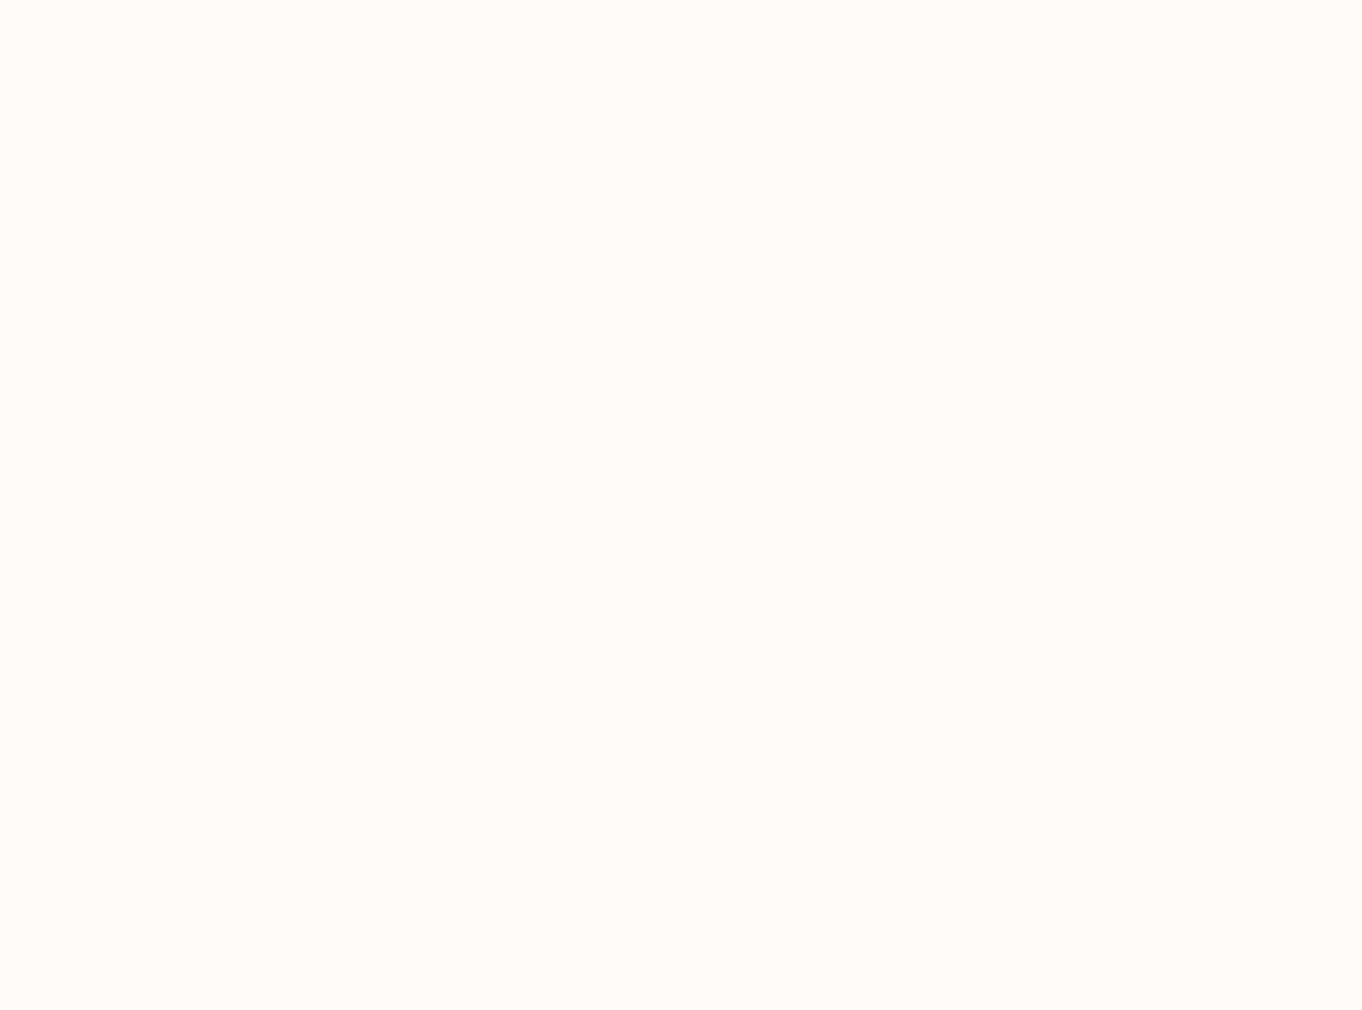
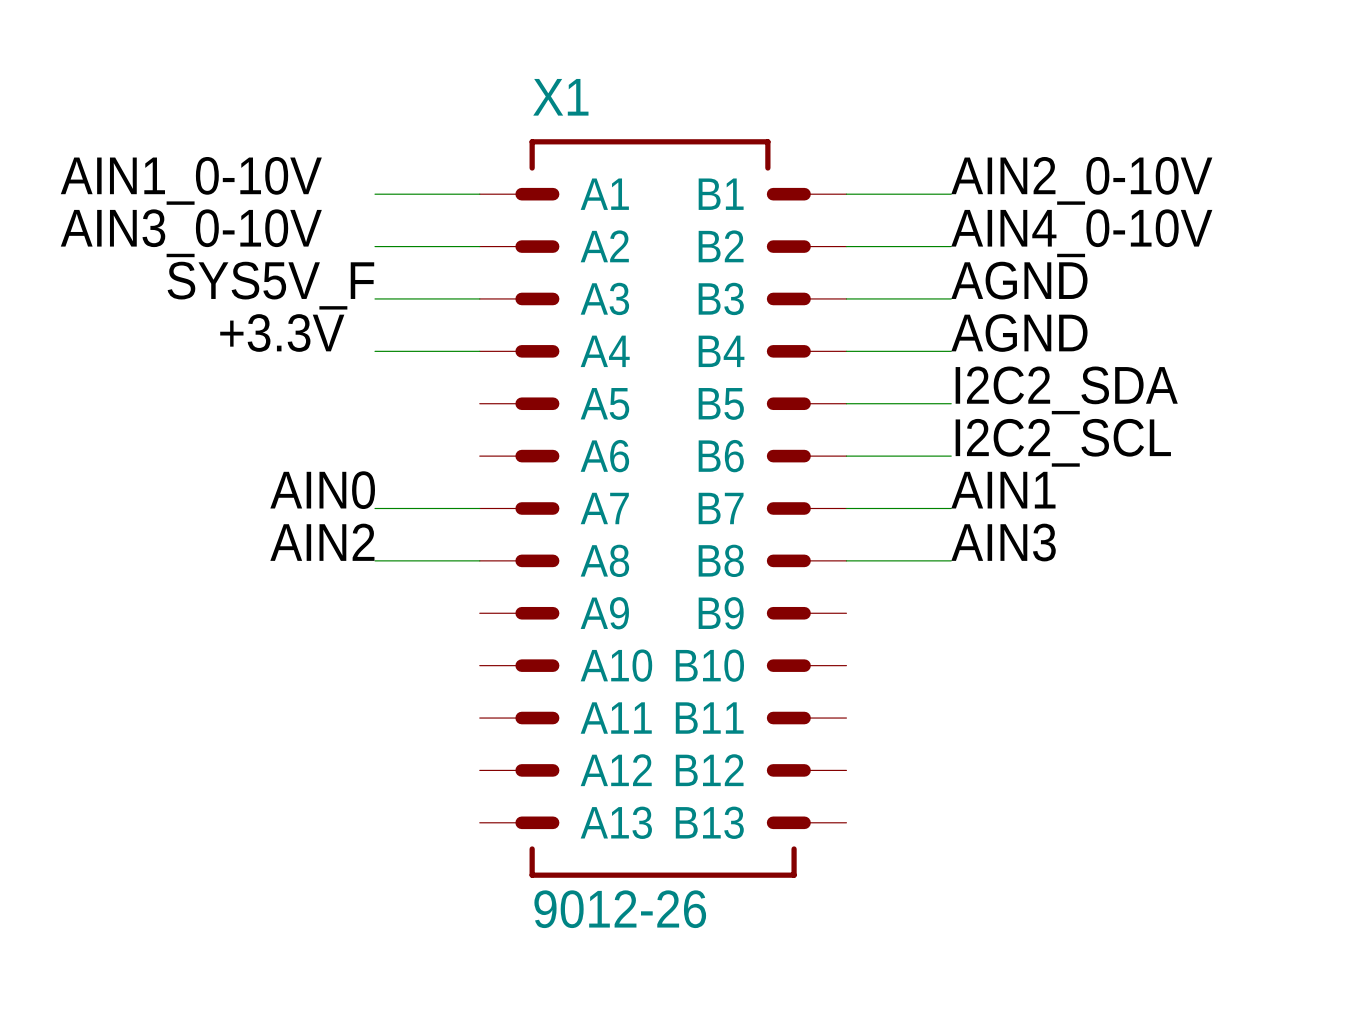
label: none -> AIN1_0-10V (191, 180)
label: none -> AIN2_0-10V (1081, 180)
wire: none -> (375, 194) (479, 194)
wire: none -> (846, 194) (951, 194)
label: none -> AIN3_0-10V (191, 233)
label: none -> AIN4_0-10V (1081, 233)
wire: none -> (375, 246) (479, 246)
wire: none -> (846, 246) (951, 246)
label: none -> AGND (1019, 280)
label: none -> SYS5V_F (270, 285)
wire: none -> (375, 298) (479, 298)
wire: none -> (846, 298) (951, 298)
label: none -> +3.3V (282, 333)
label: none -> AGND (1019, 333)
wire: none -> (375, 351) (479, 351)
wire: none -> (846, 351) (951, 351)
label: none -> I2C2_SDA (1066, 390)
wire: none -> (846, 403) (951, 403)
label: none -> I2C2_SCL (1063, 442)
wire: none -> (846, 456) (951, 456)
label: none -> AIN0 (322, 490)
label: none -> AIN1 (1003, 490)
wire: none -> (375, 508) (479, 508)
X1: none -> 9012-26 (663, 508)
wire: none -> (846, 508) (951, 508)
label: none -> AIN2 (322, 542)
label: none -> AIN3 (1003, 542)
wire: none -> (375, 560) (479, 560)
wire: none -> (846, 560) (951, 560)

